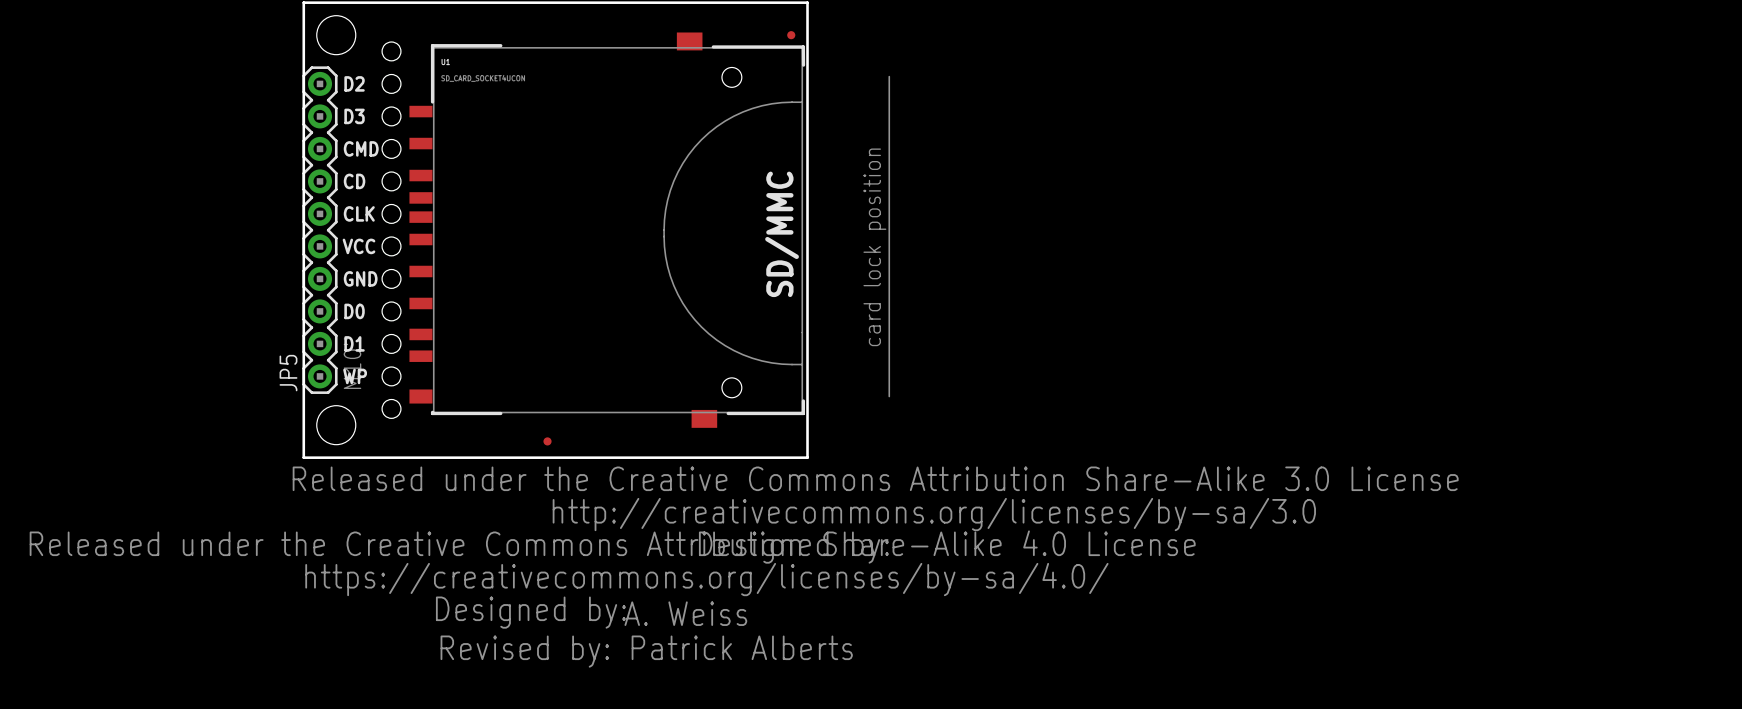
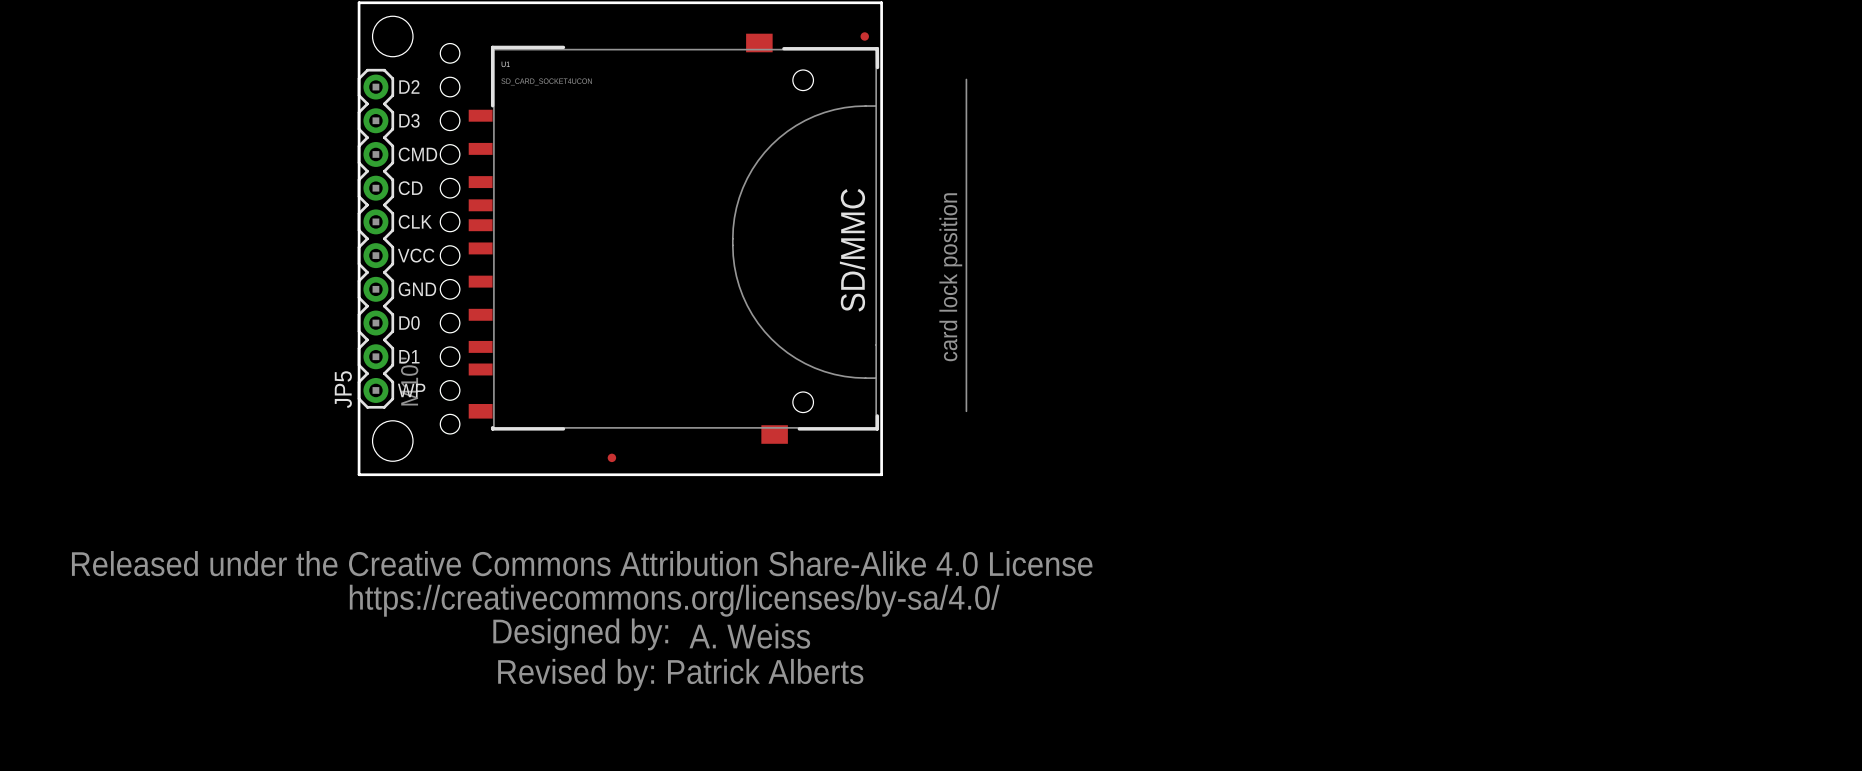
drawing: [292, 466, 1459, 564] -> none

